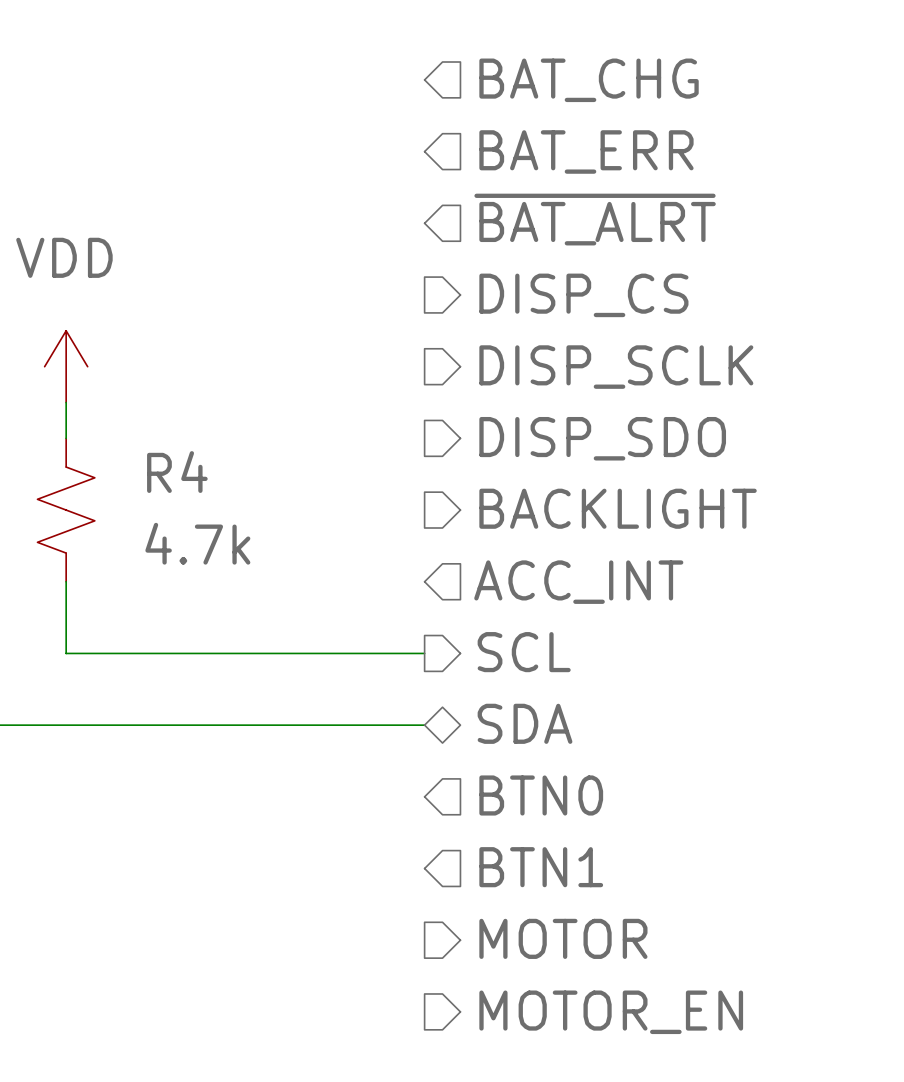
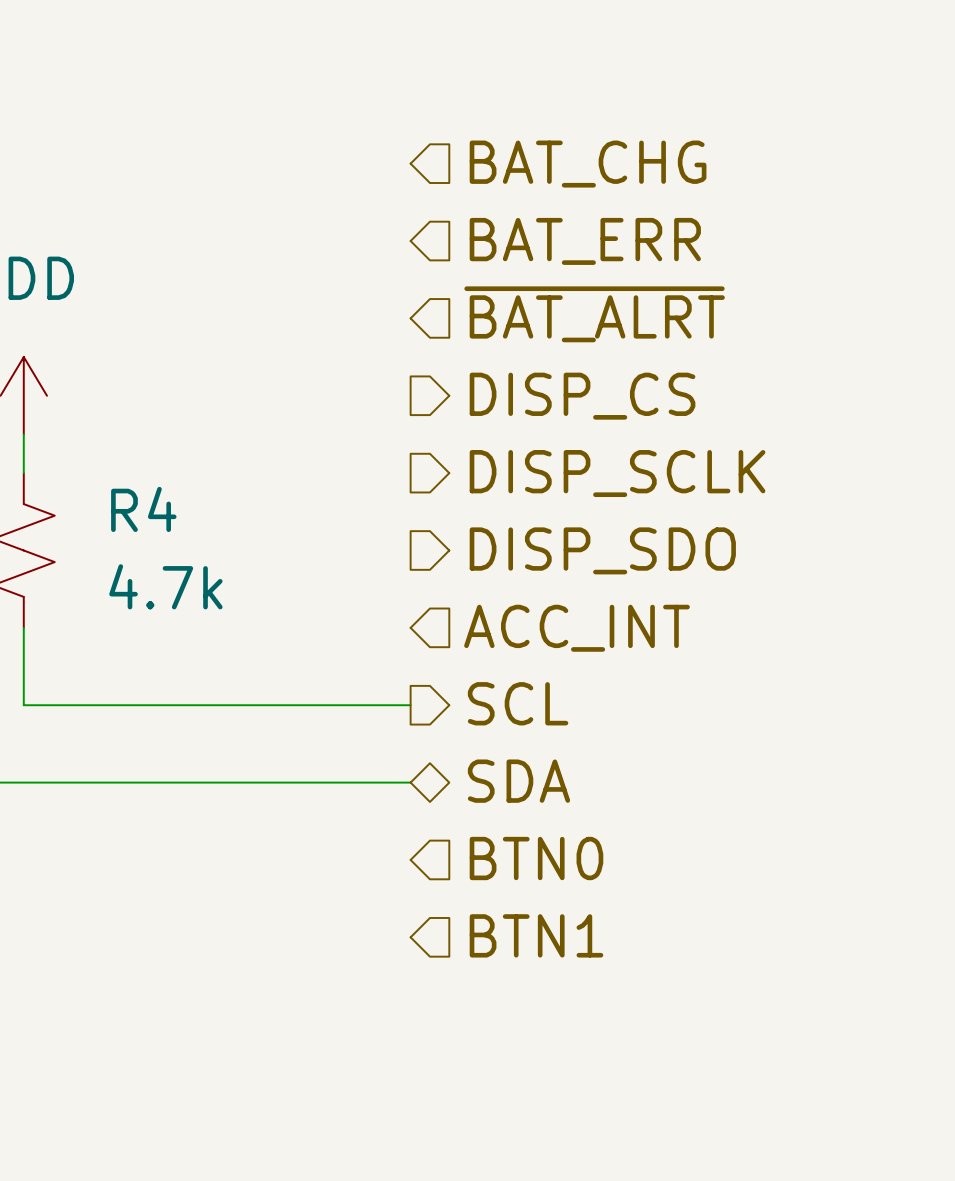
hierarchical label: BAT_CHG (589, 80) -> none
hierarchical label: BAT_ERR (586, 151) -> BAT_CHG (588, 164)
hierarchical label: ~{BAT_ALRT} (595, 219) -> BAT_ERR (585, 241)
hierarchical label shape: output (583, 295) -> input (594, 314)
hierarchical label: DISP_CS (583, 295) -> ~{BAT_ALRT} (594, 314)
hierarchical label: DISP_SCLK (616, 367) -> DISP_CS (582, 396)
hierarchical label: DISP_SDO (602, 438) -> DISP_SCLK (617, 473)
hierarchical label: BACKLIGHT (618, 508) -> DISP_SDO (602, 550)
hierarchical label: MOTOR (563, 938) -> none
hierarchical label: MOTOR_EN (611, 1012) -> none

